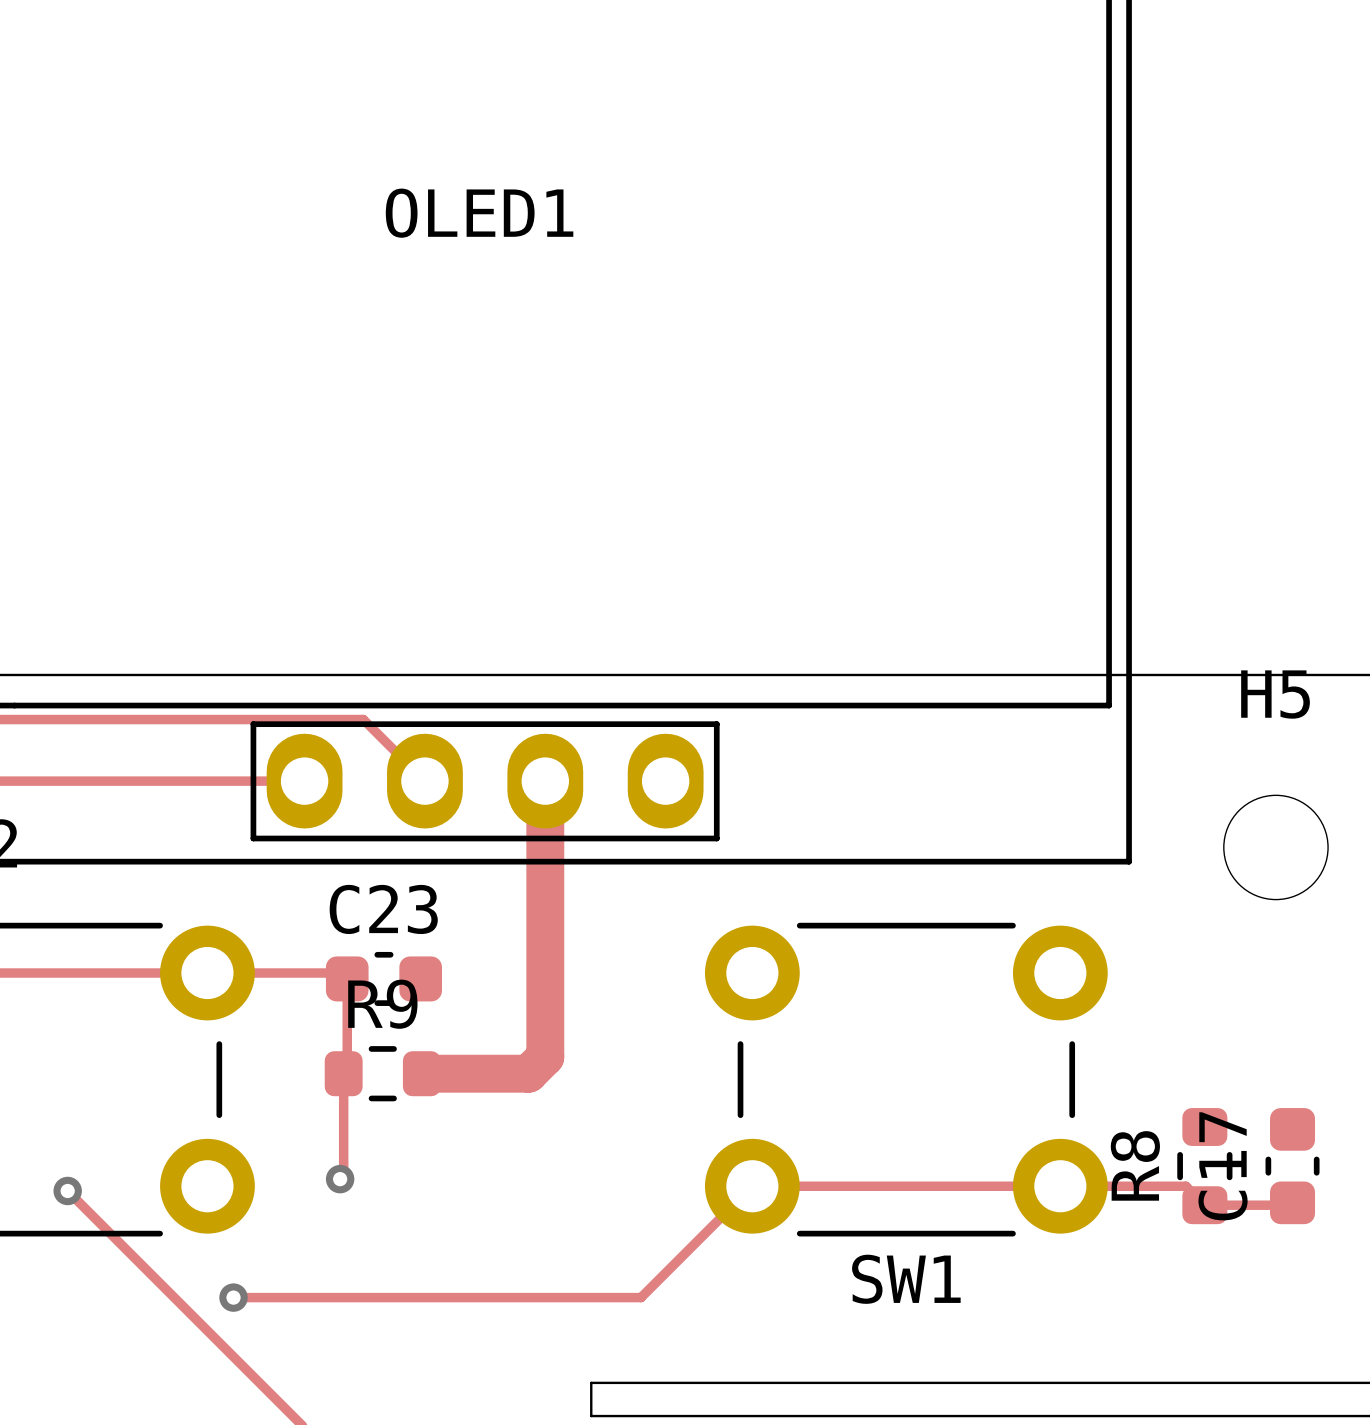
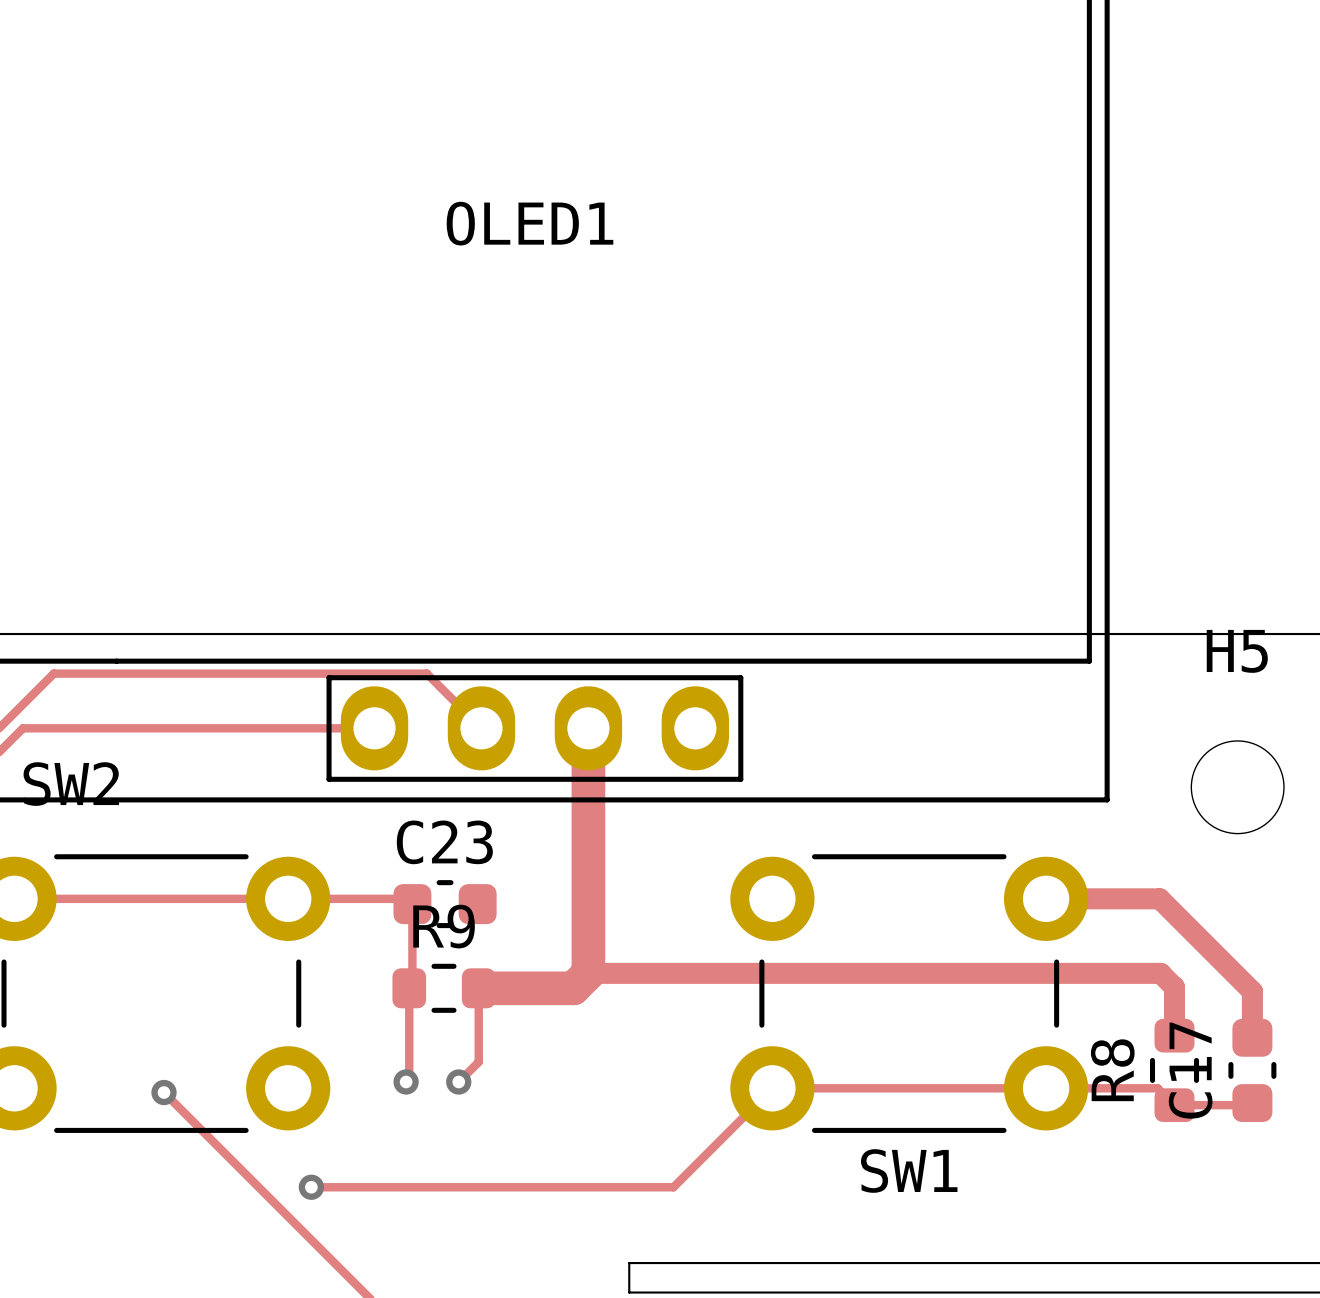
track: none -> (1046, 898) (1159, 898) (1252, 991) (1252, 1037)
track: none -> (588, 973) (1160, 973) (1174, 987) (1174, 1035)
track: none -> (478, 988) (478, 1062) (458, 1082)
via: none -> (458, 1082)

